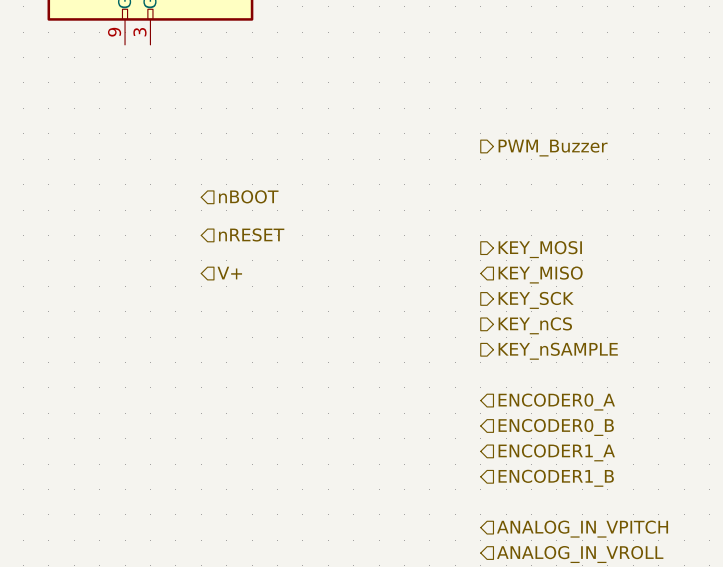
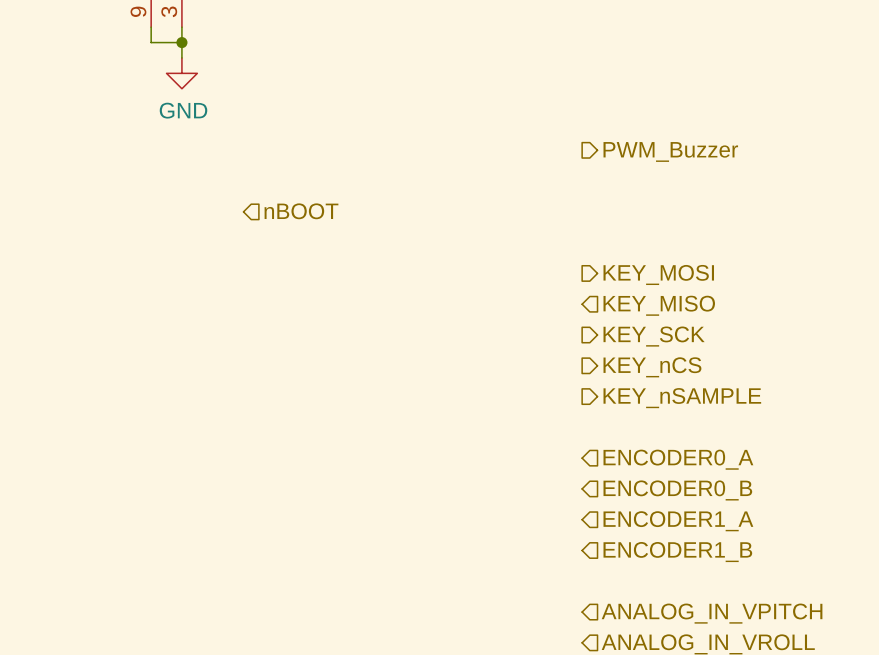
wire: none -> (151, 27) (151, 42) (181, 42)
wire: none -> (181, 27) (181, 57)
junction: none -> (181, 42)
power symbol: none -> GND (181, 73)
hierarchical label: nRESET (251, 234) -> none
hierarchical label: V+ (229, 273) -> none

